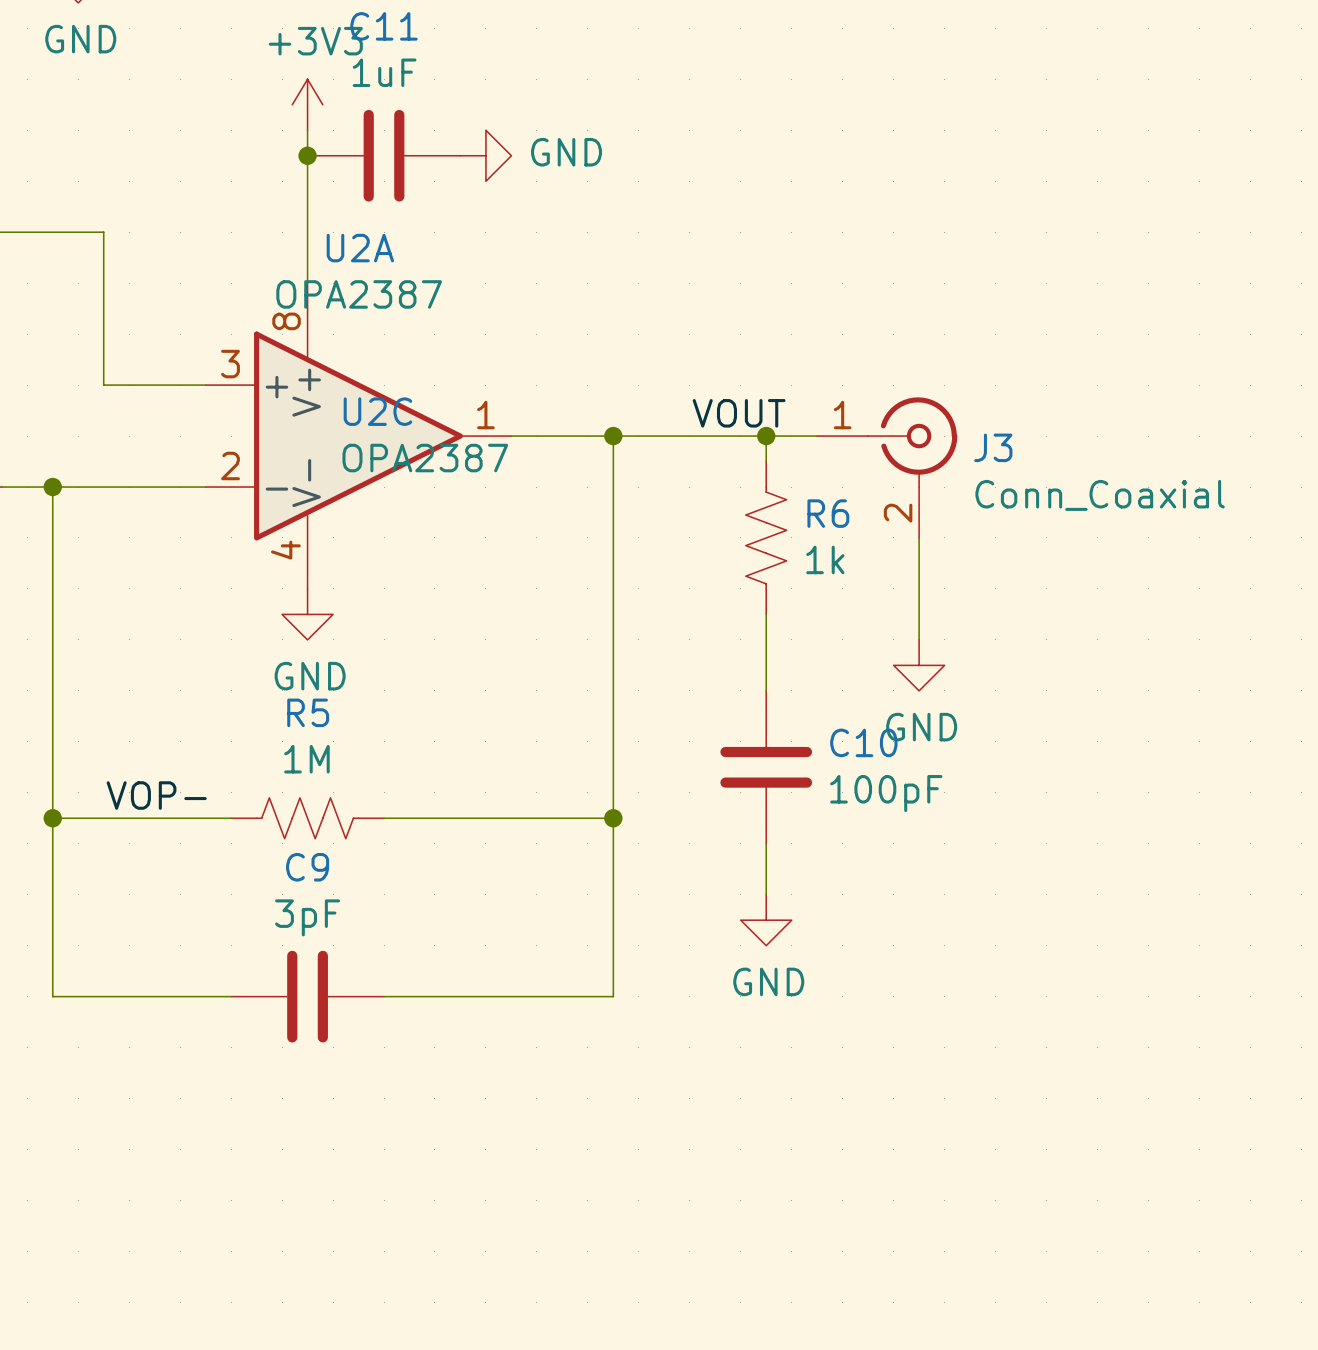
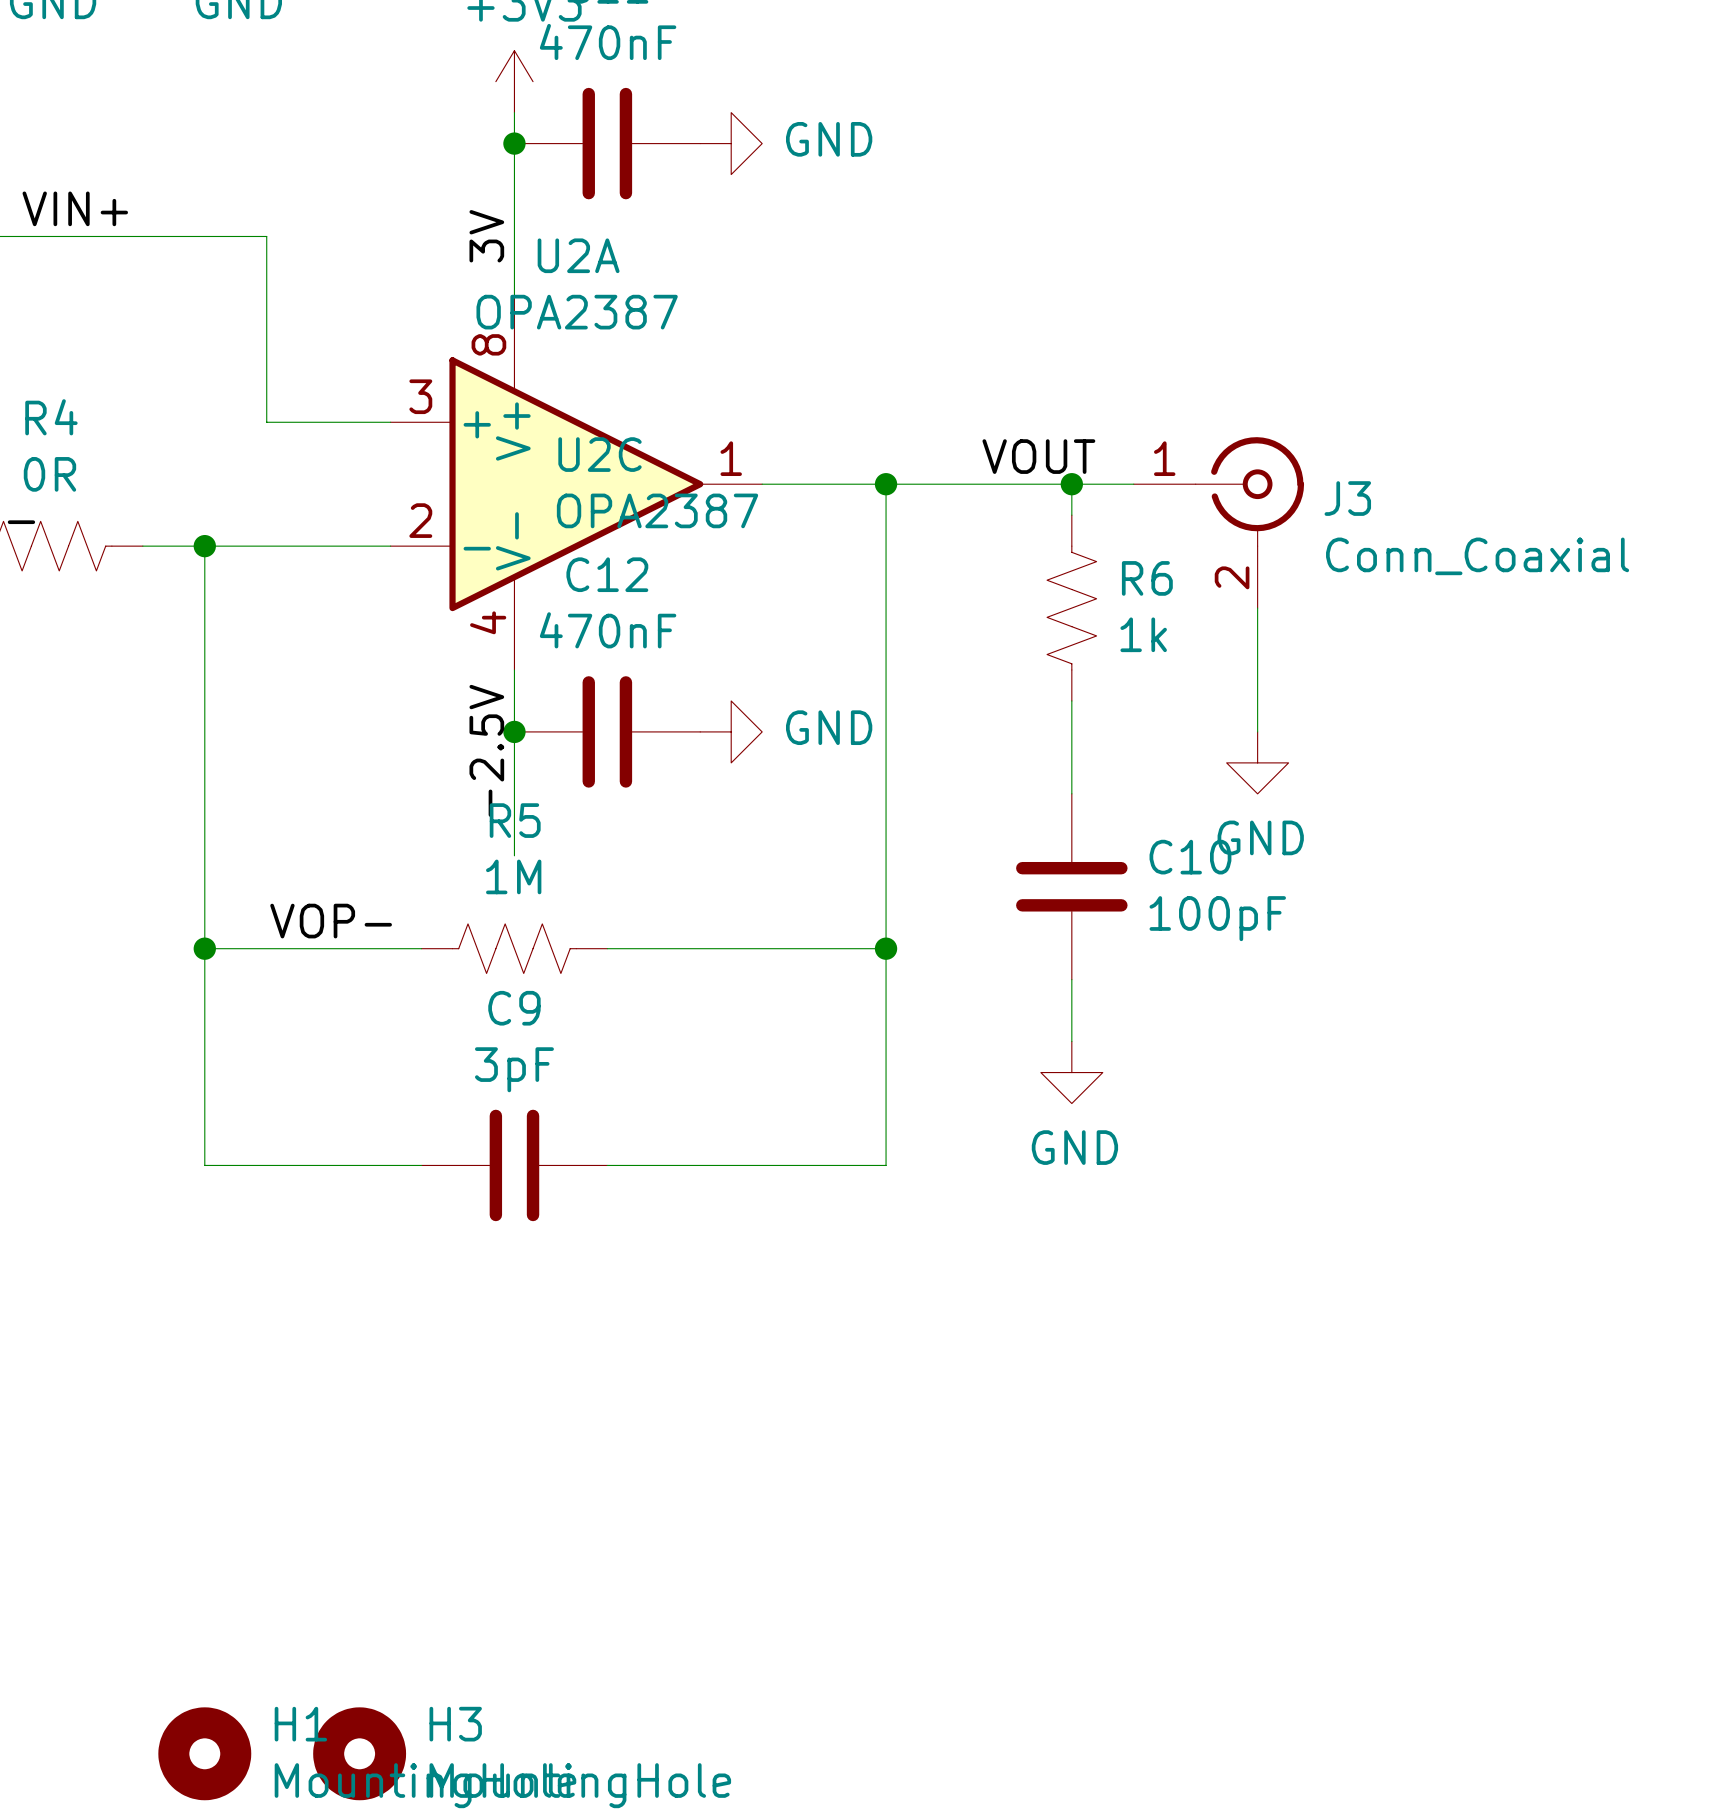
C11 value: 1uF (384, 72) -> 470nF (608, 41)
label: none -> 3V (486, 236)
wire: none -> (514, 670) (514, 855)
power symbol rotation: 0° (307, 614) -> 90° counterclockwise (731, 731)
power symbol position: GND (307, 614) -> GND (731, 731)
junction: none -> (514, 731)
C12: none -> 470nF (607, 731)
label: none -> -2.5V (486, 750)

